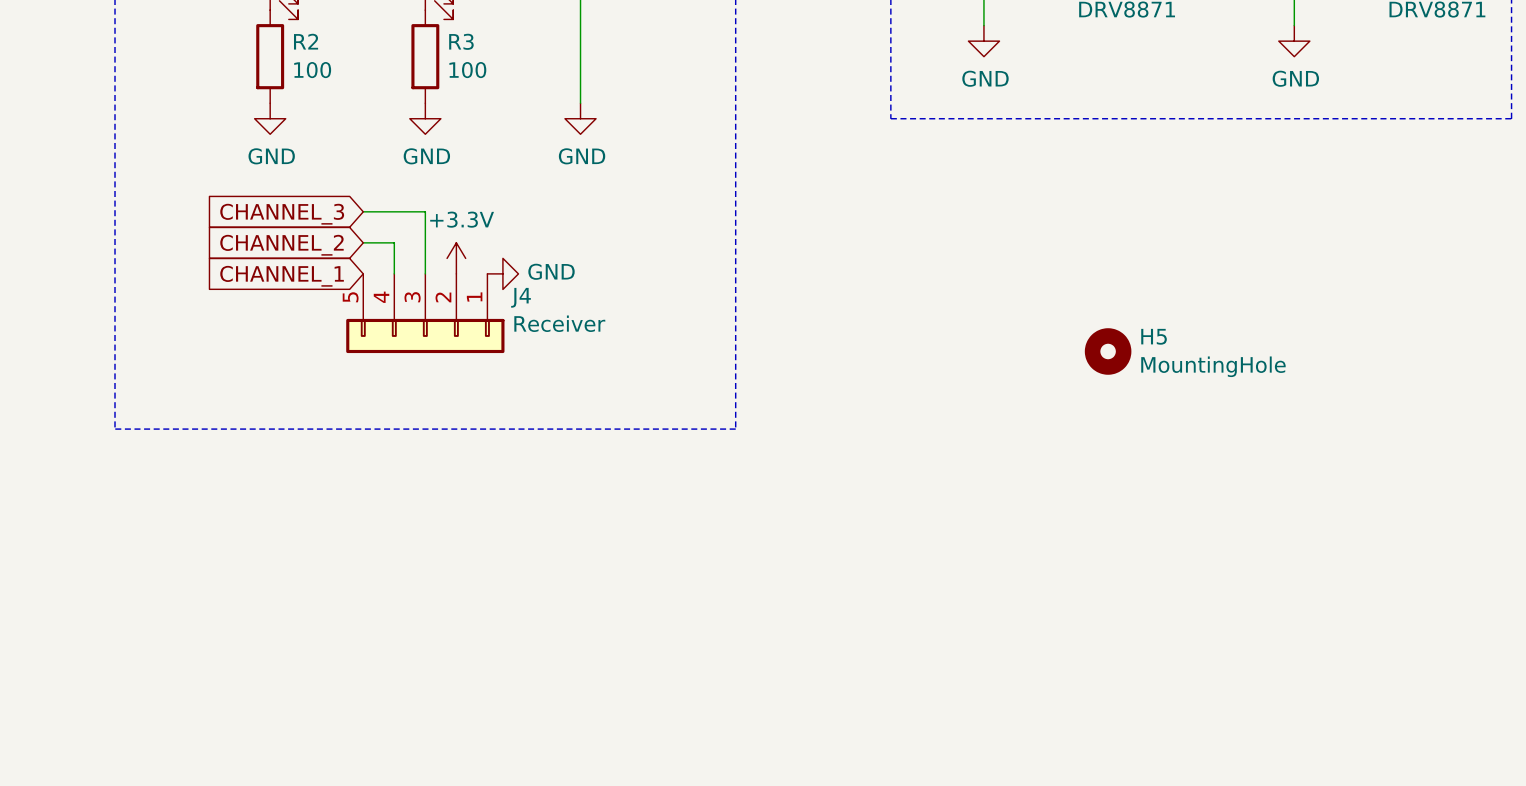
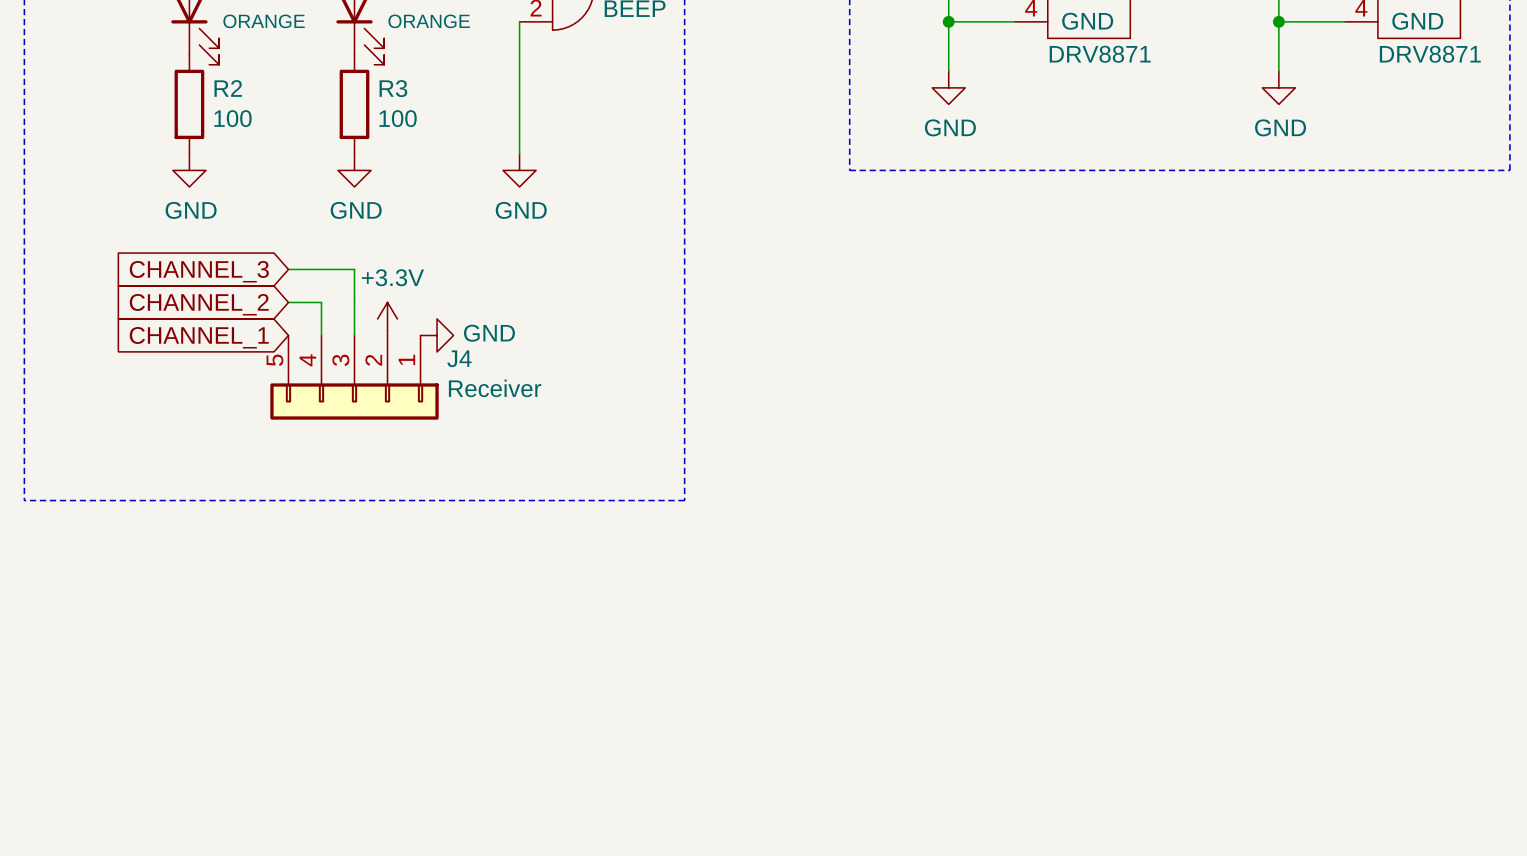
H5: MountingHole (1108, 351) -> none

